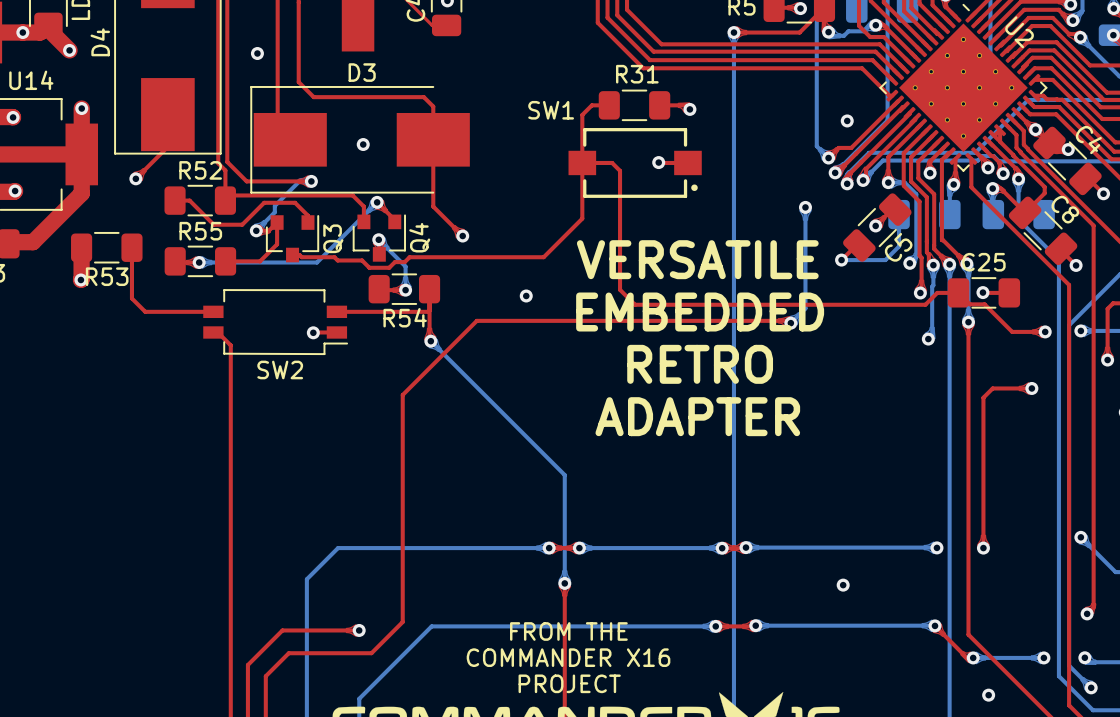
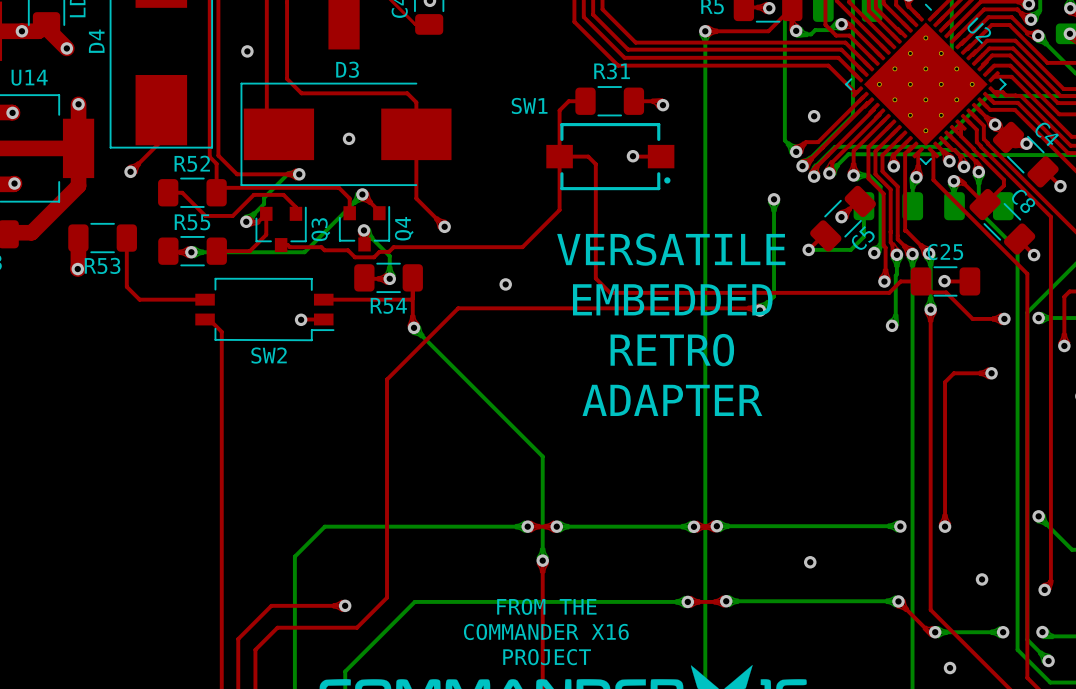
via: none -> (982, 579)

